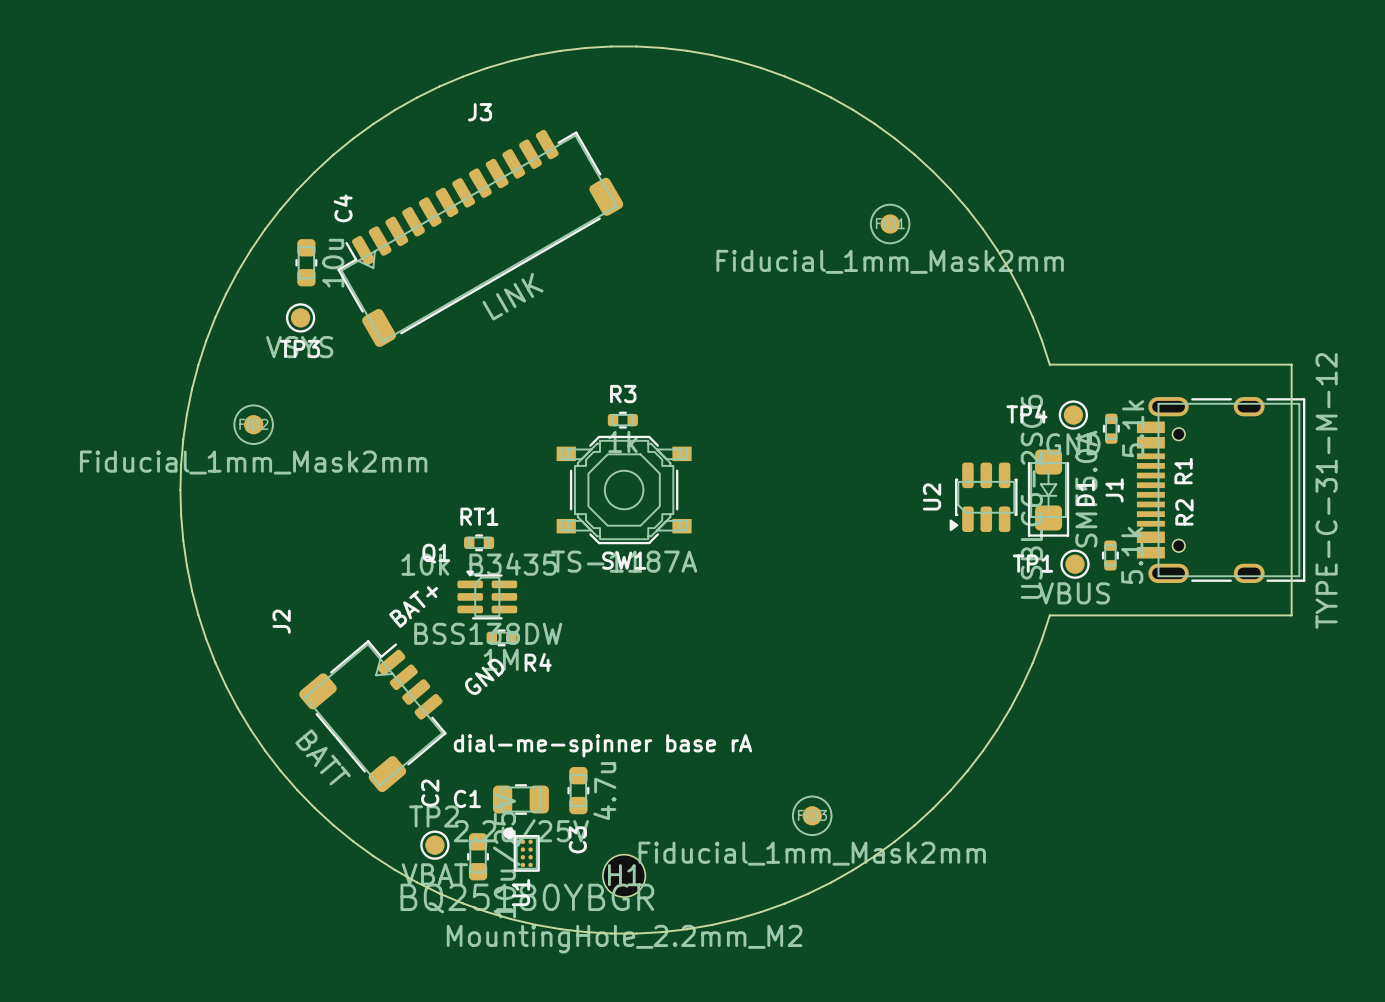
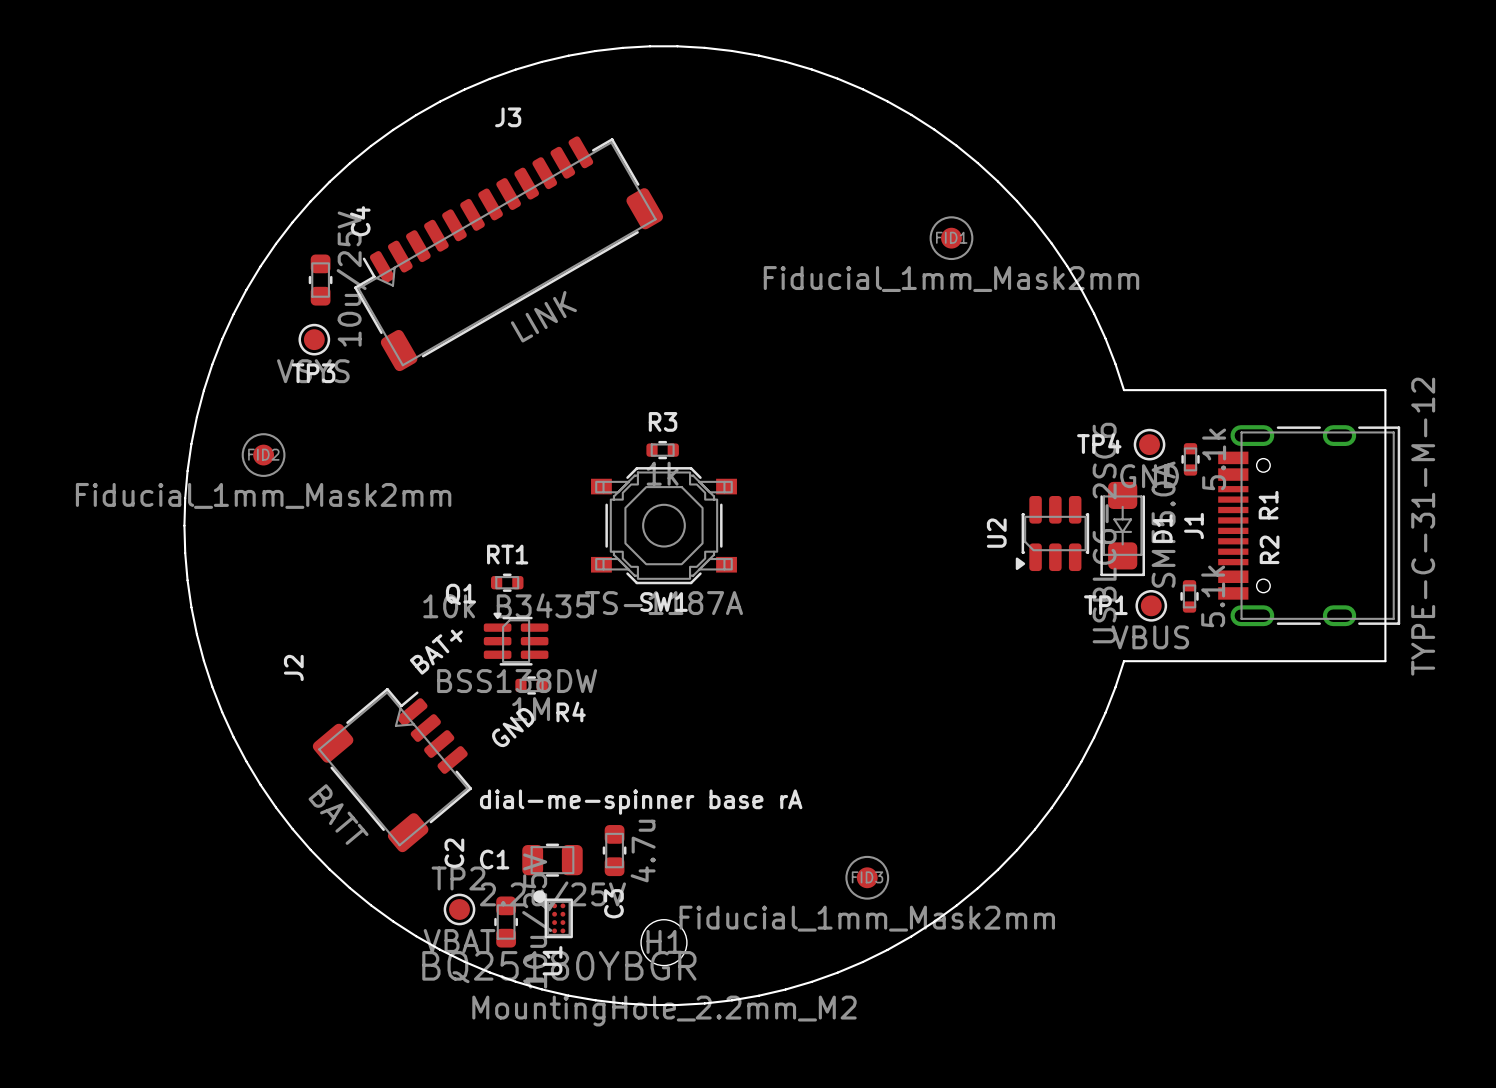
C4 value: 10u (333, 263) -> 10u/25V (351, 279)

